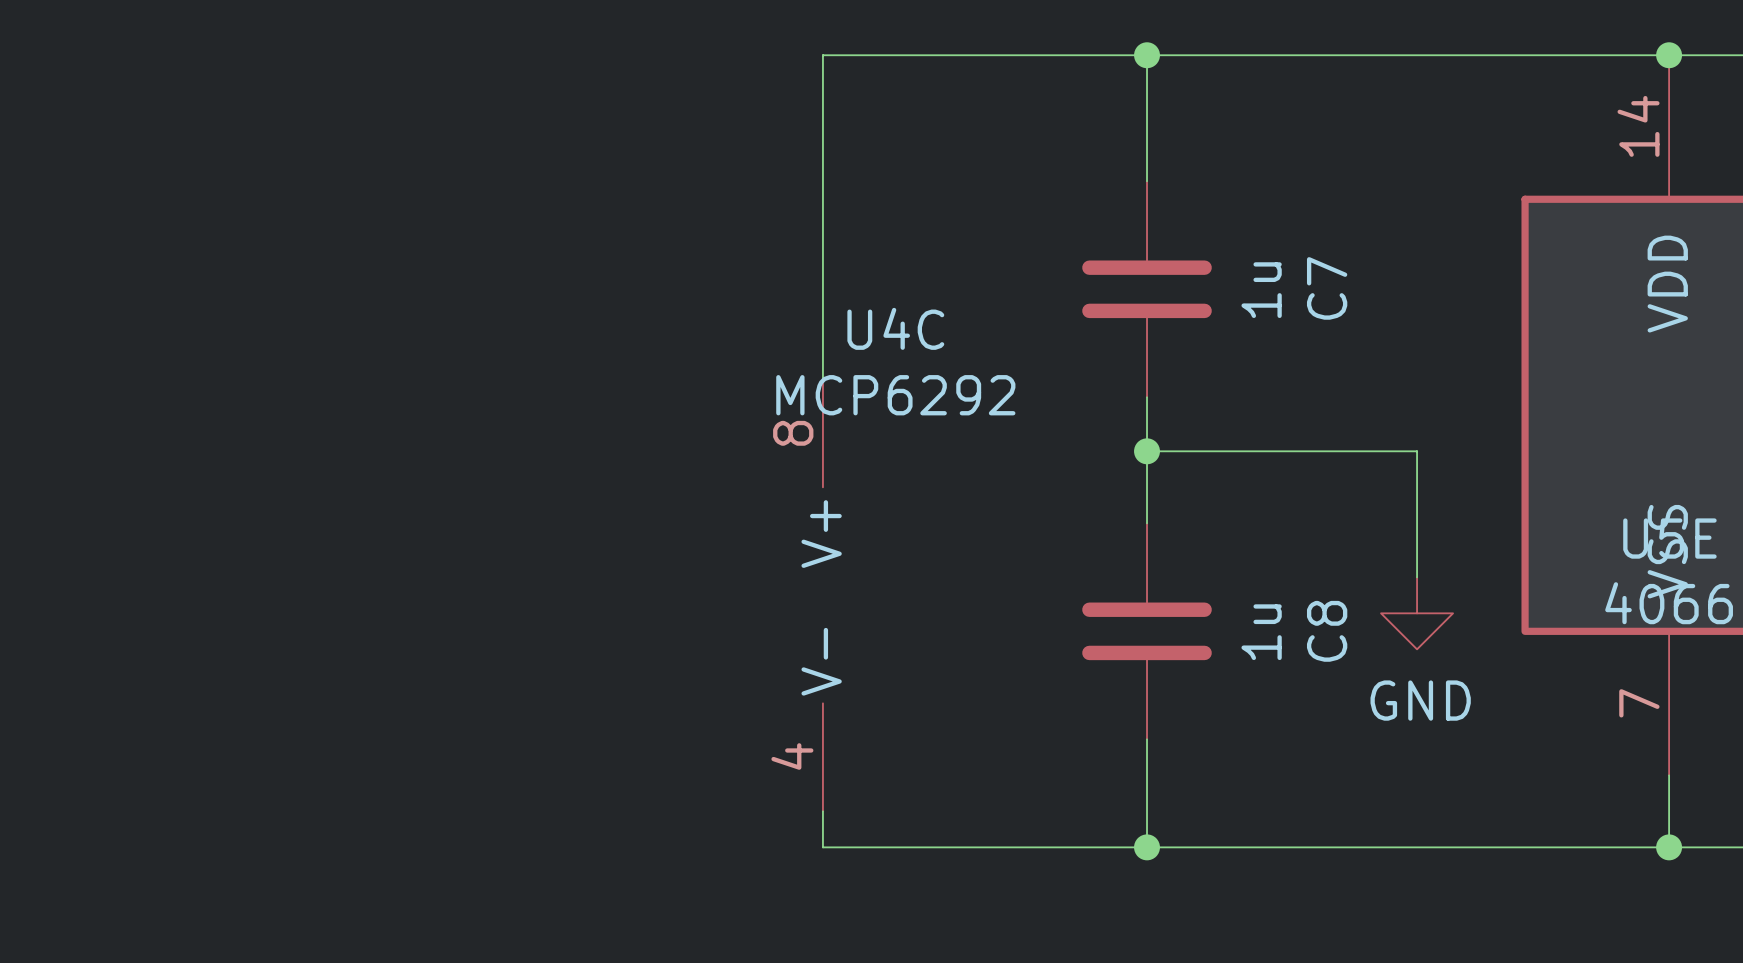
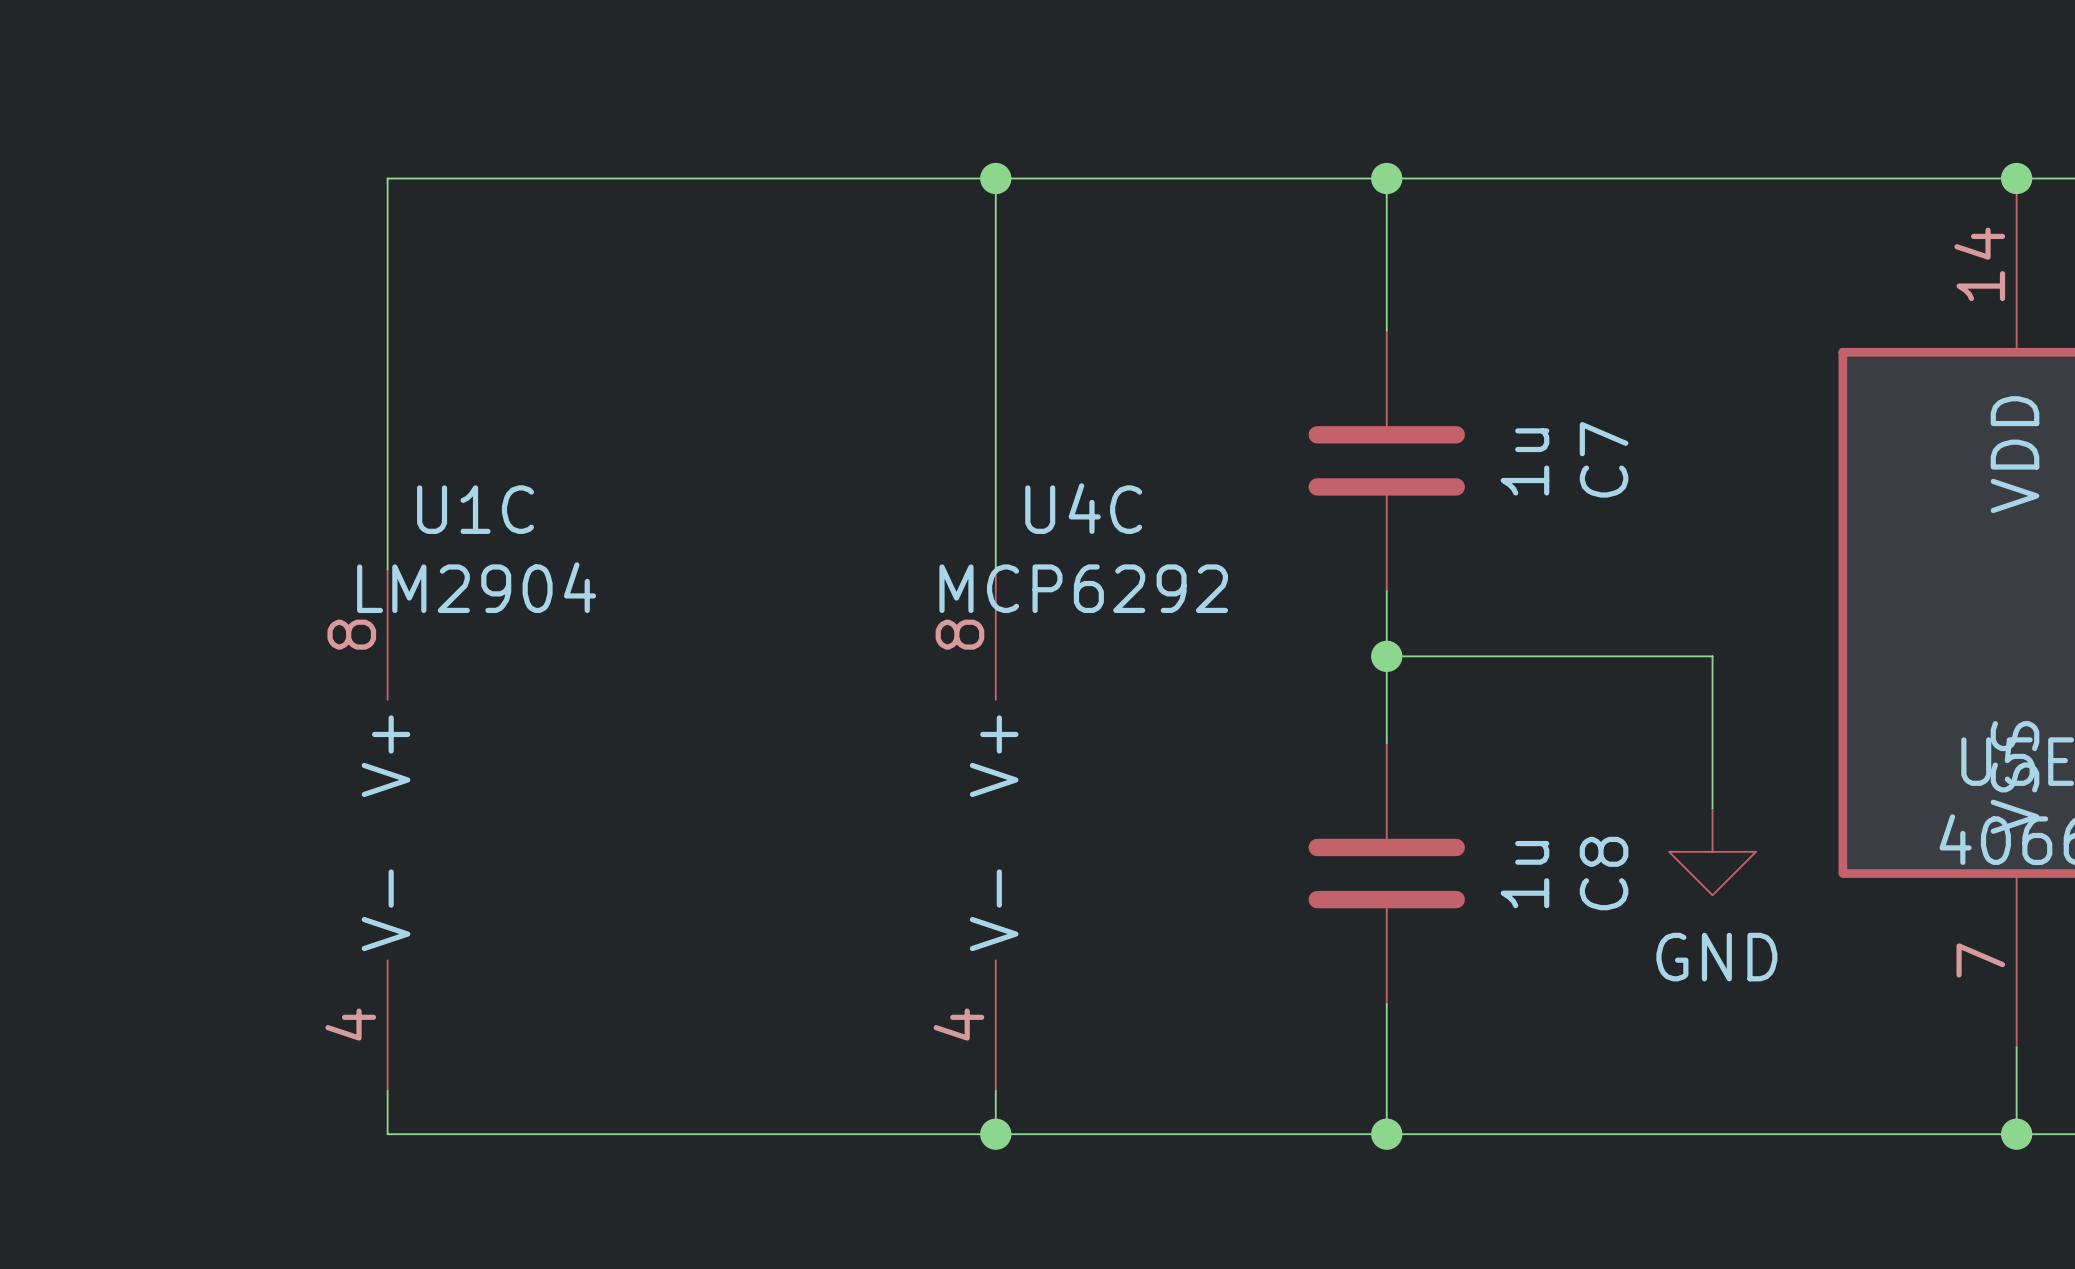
wire: none -> (995, 178) (387, 178) (387, 569)
junction: none -> (995, 178)
U1C: none -> LM2904 (387, 830)
wire: none -> (387, 1090) (387, 1134) (995, 1134)
junction: none -> (995, 1134)

